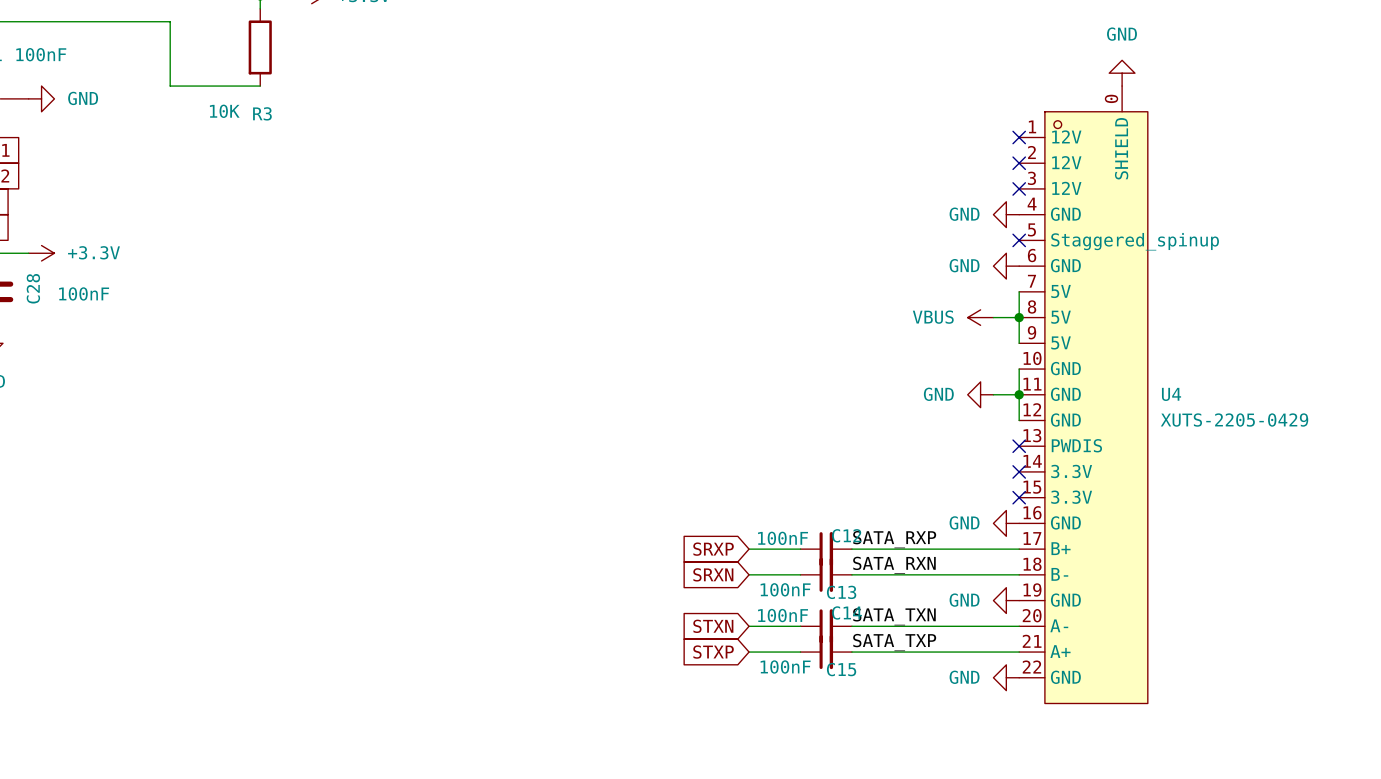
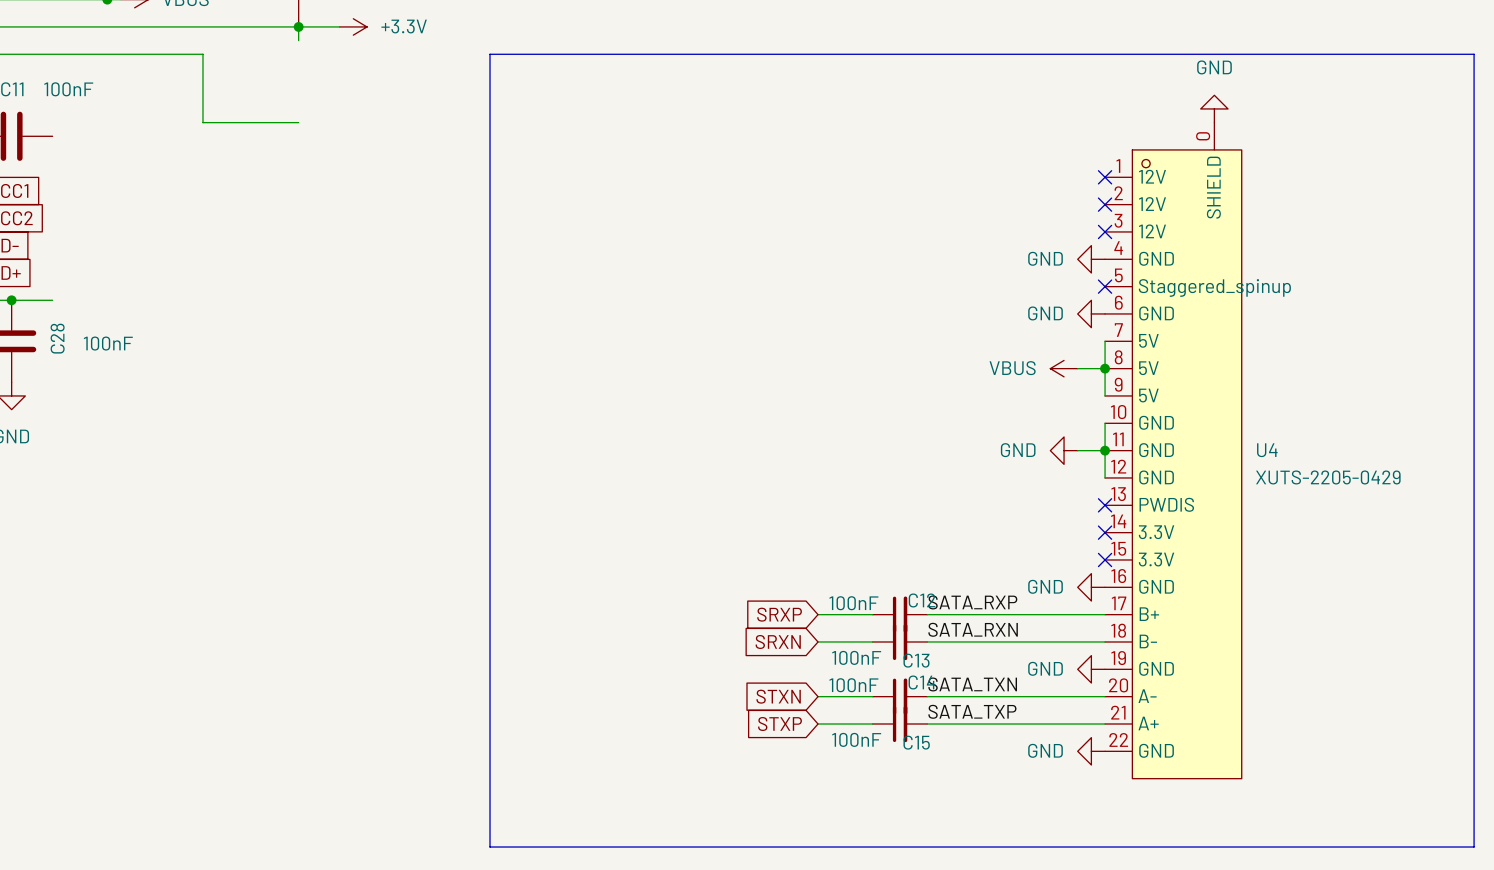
line: none -> (490, 54) (1474, 54) (1474, 847) (490, 847) (490, 54)
R3: 10K (260, 47) -> none
power symbol: GND (41, 98) -> none
power symbol: +3.3V (41, 253) -> none

